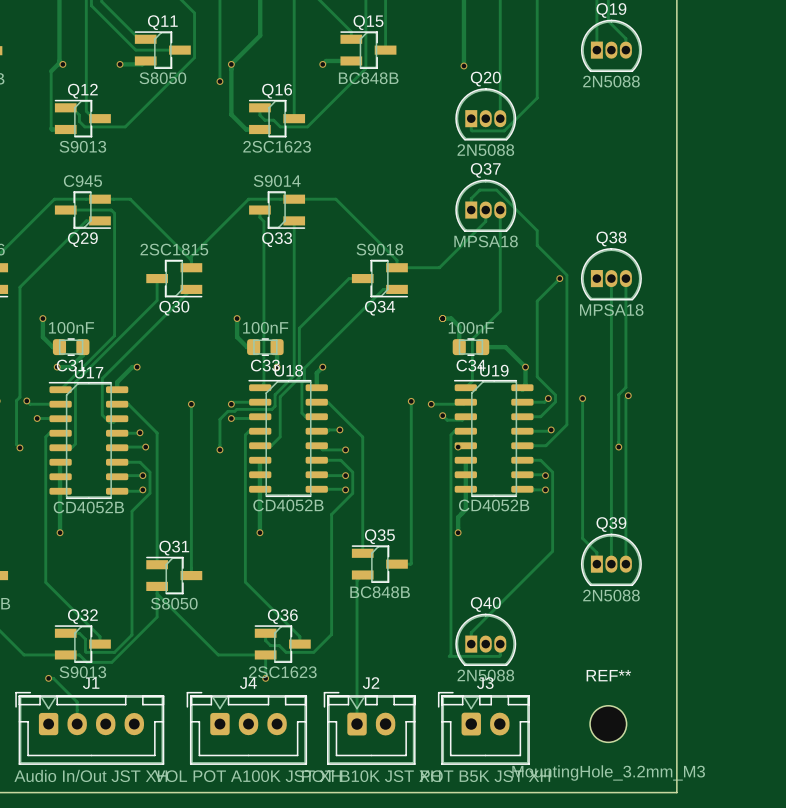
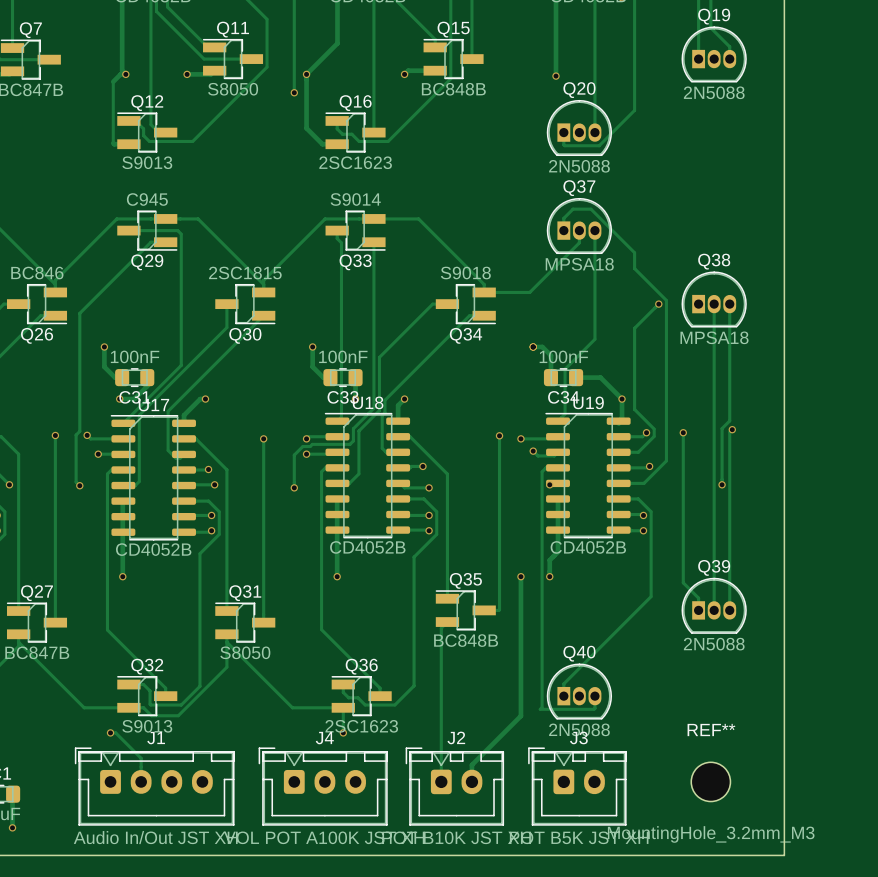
track: none -> (520, 576) (520, 715) (471, 765) (471, 781)
via: none -> (520, 576)

